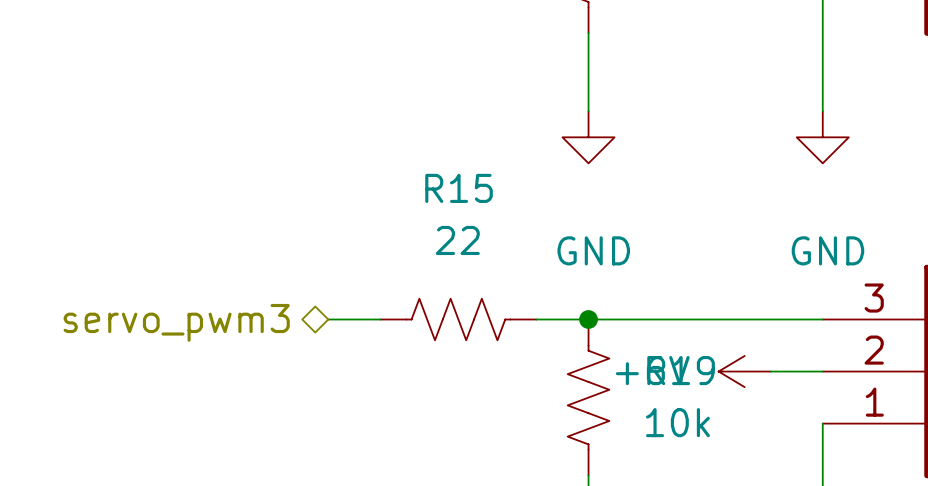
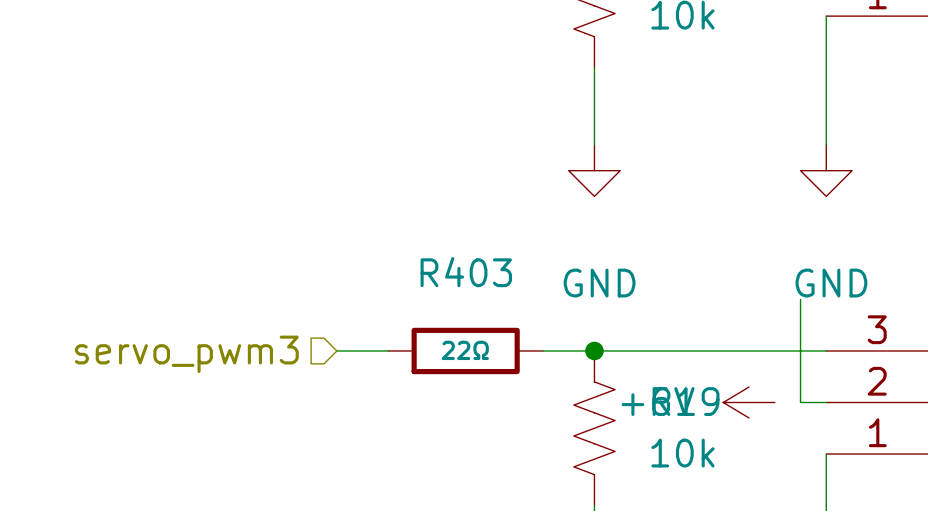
R15: 22 (458, 319) -> none
R403: none -> 22Ω (465, 350)
hierarchical label shape: bidirectional (176, 322) -> input (186, 354)
wire: (770, 371) (796, 371) -> (800, 299) (800, 402)

